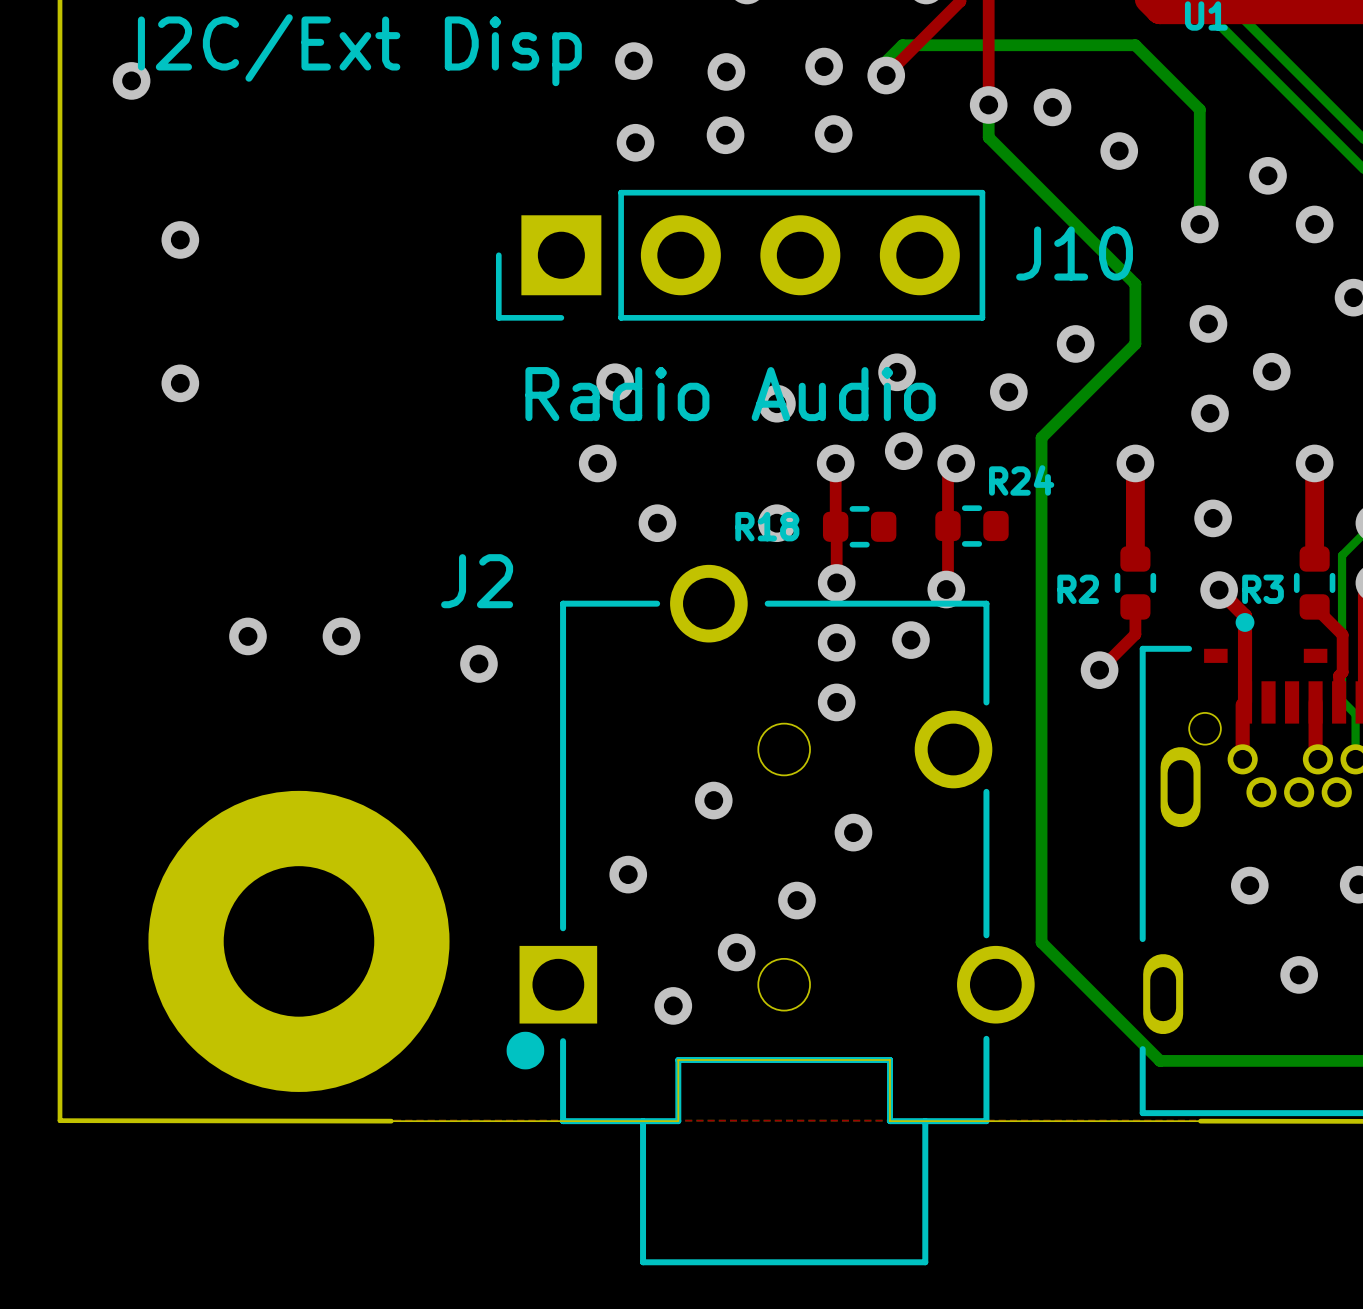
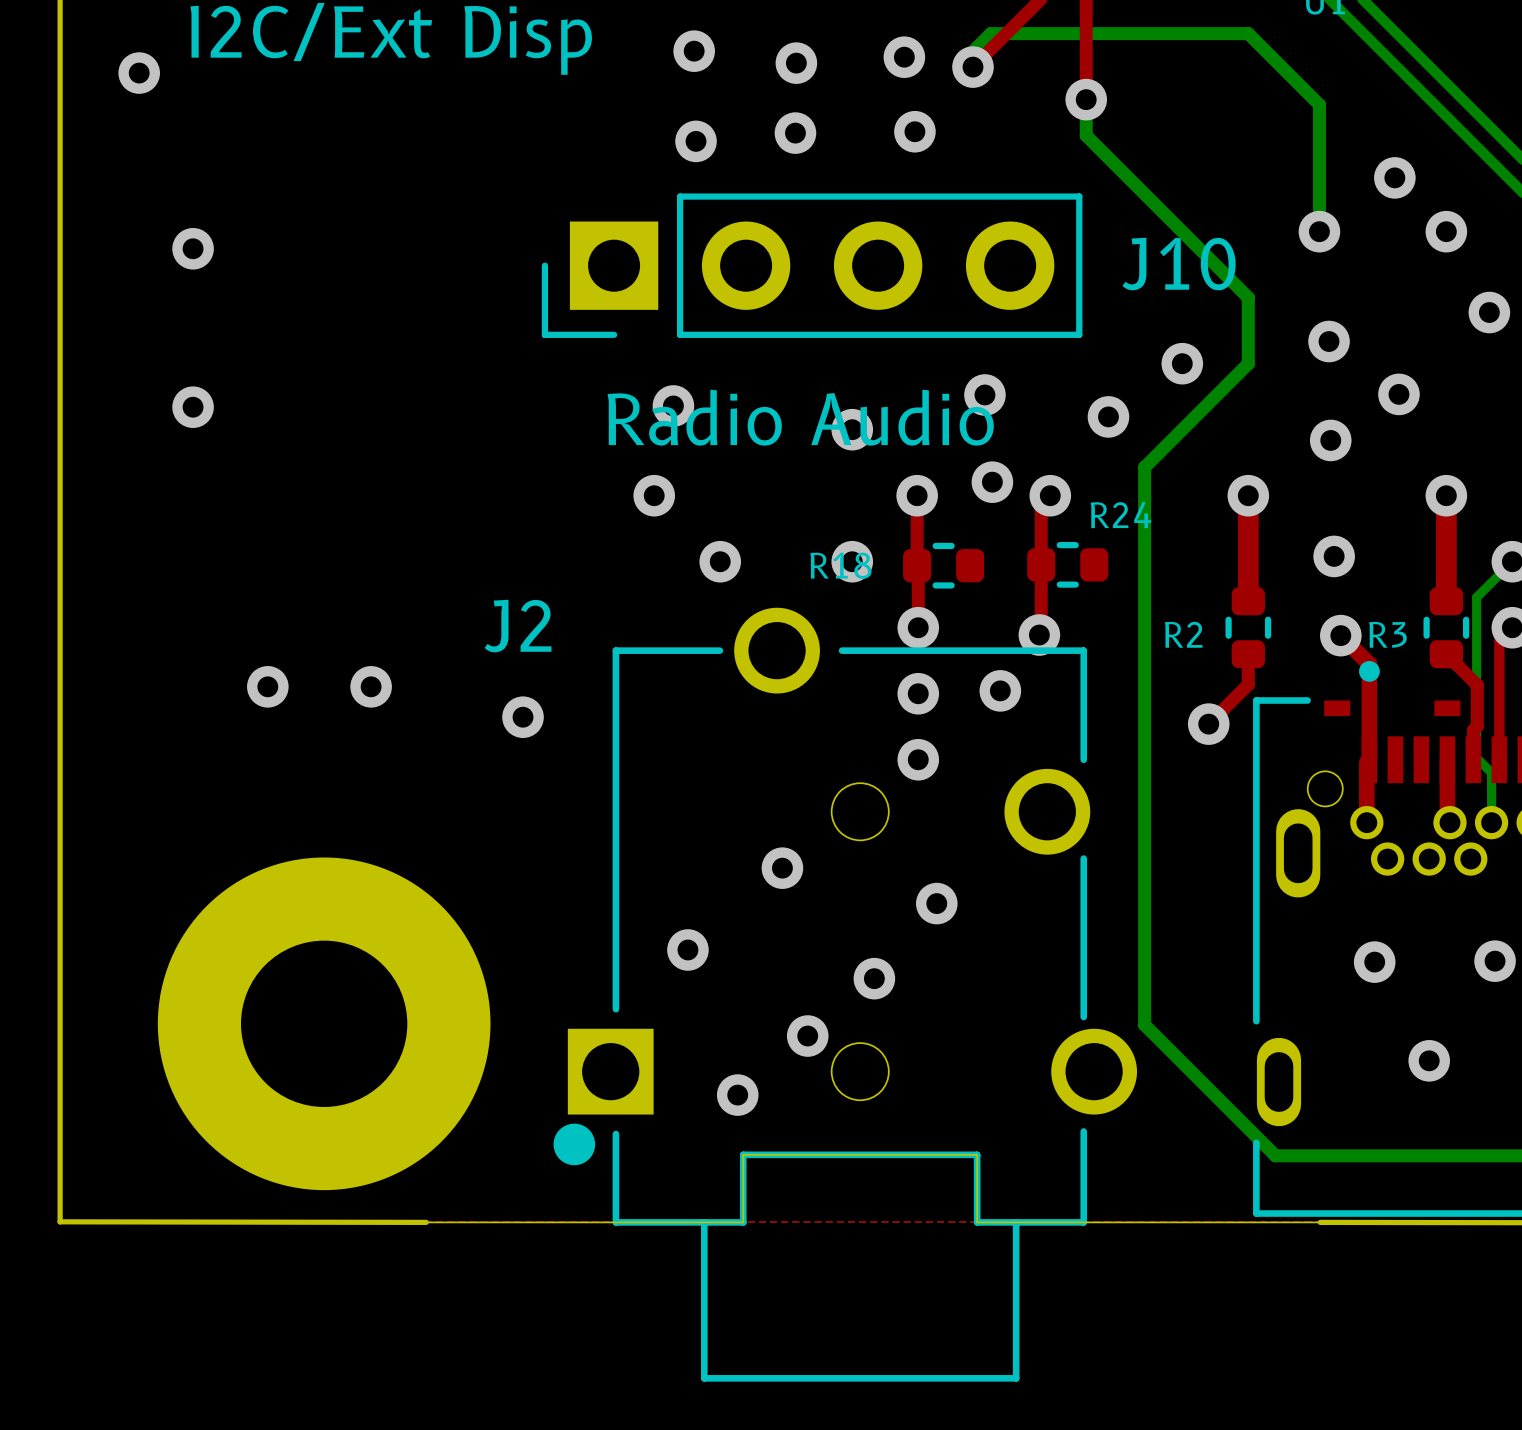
via: (1052, 107) -> none
via: (1119, 151) -> none

